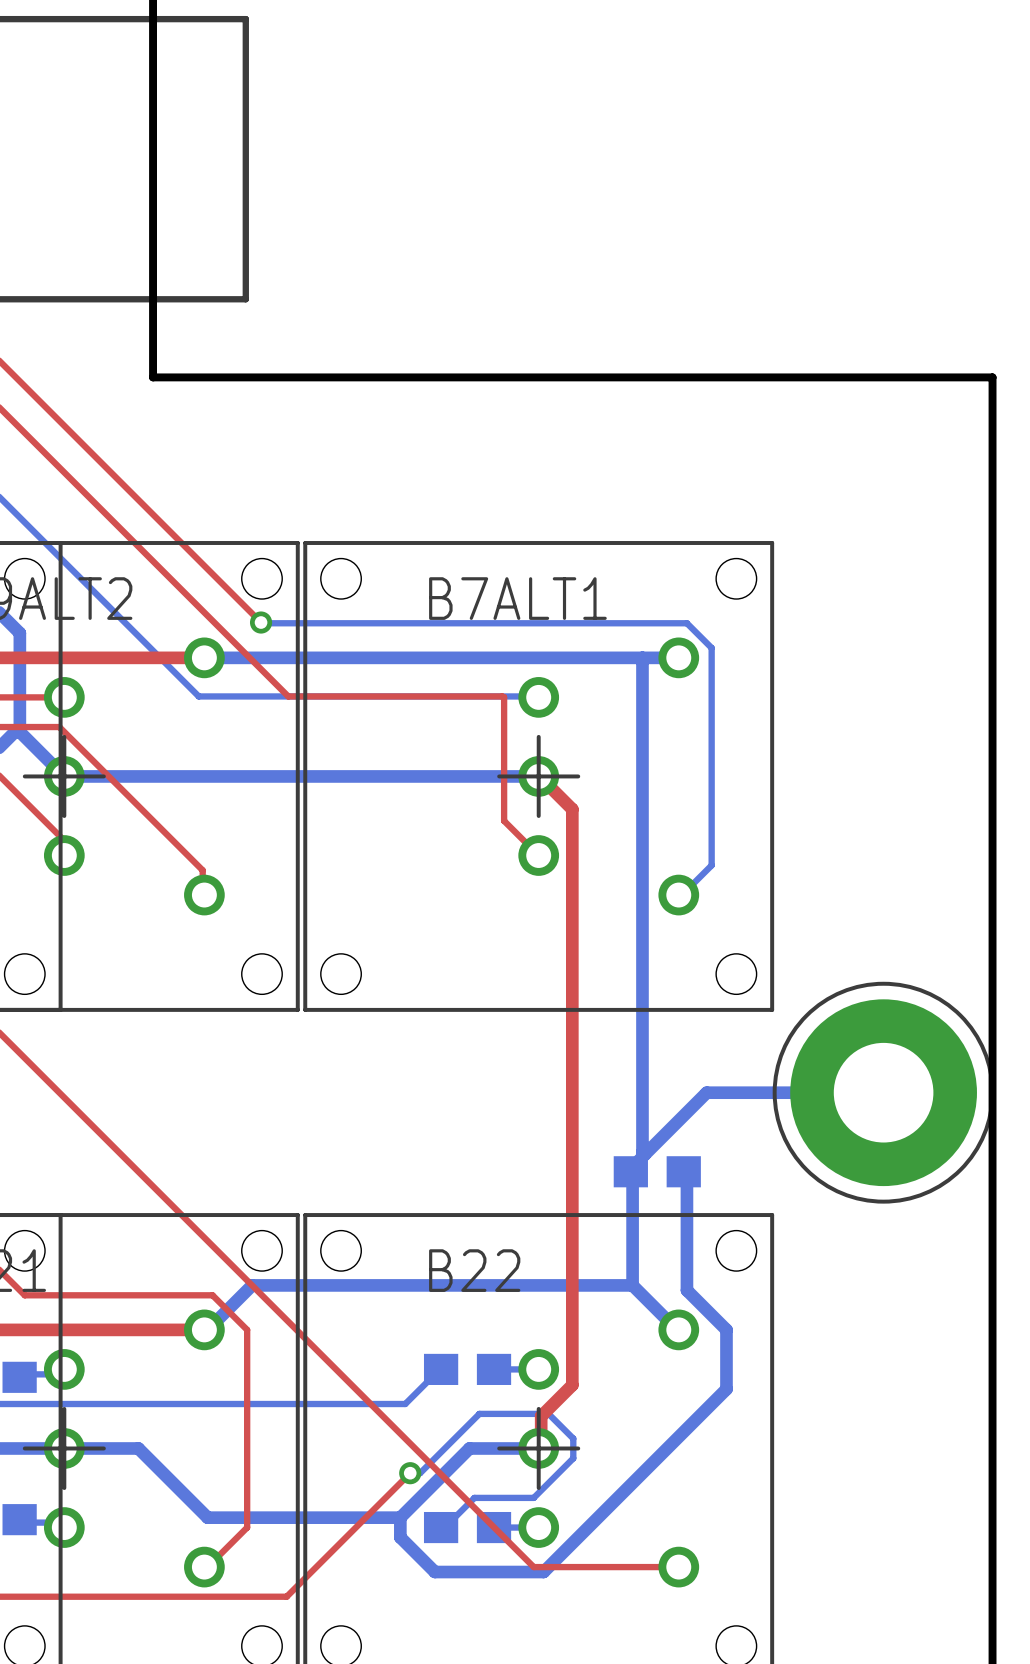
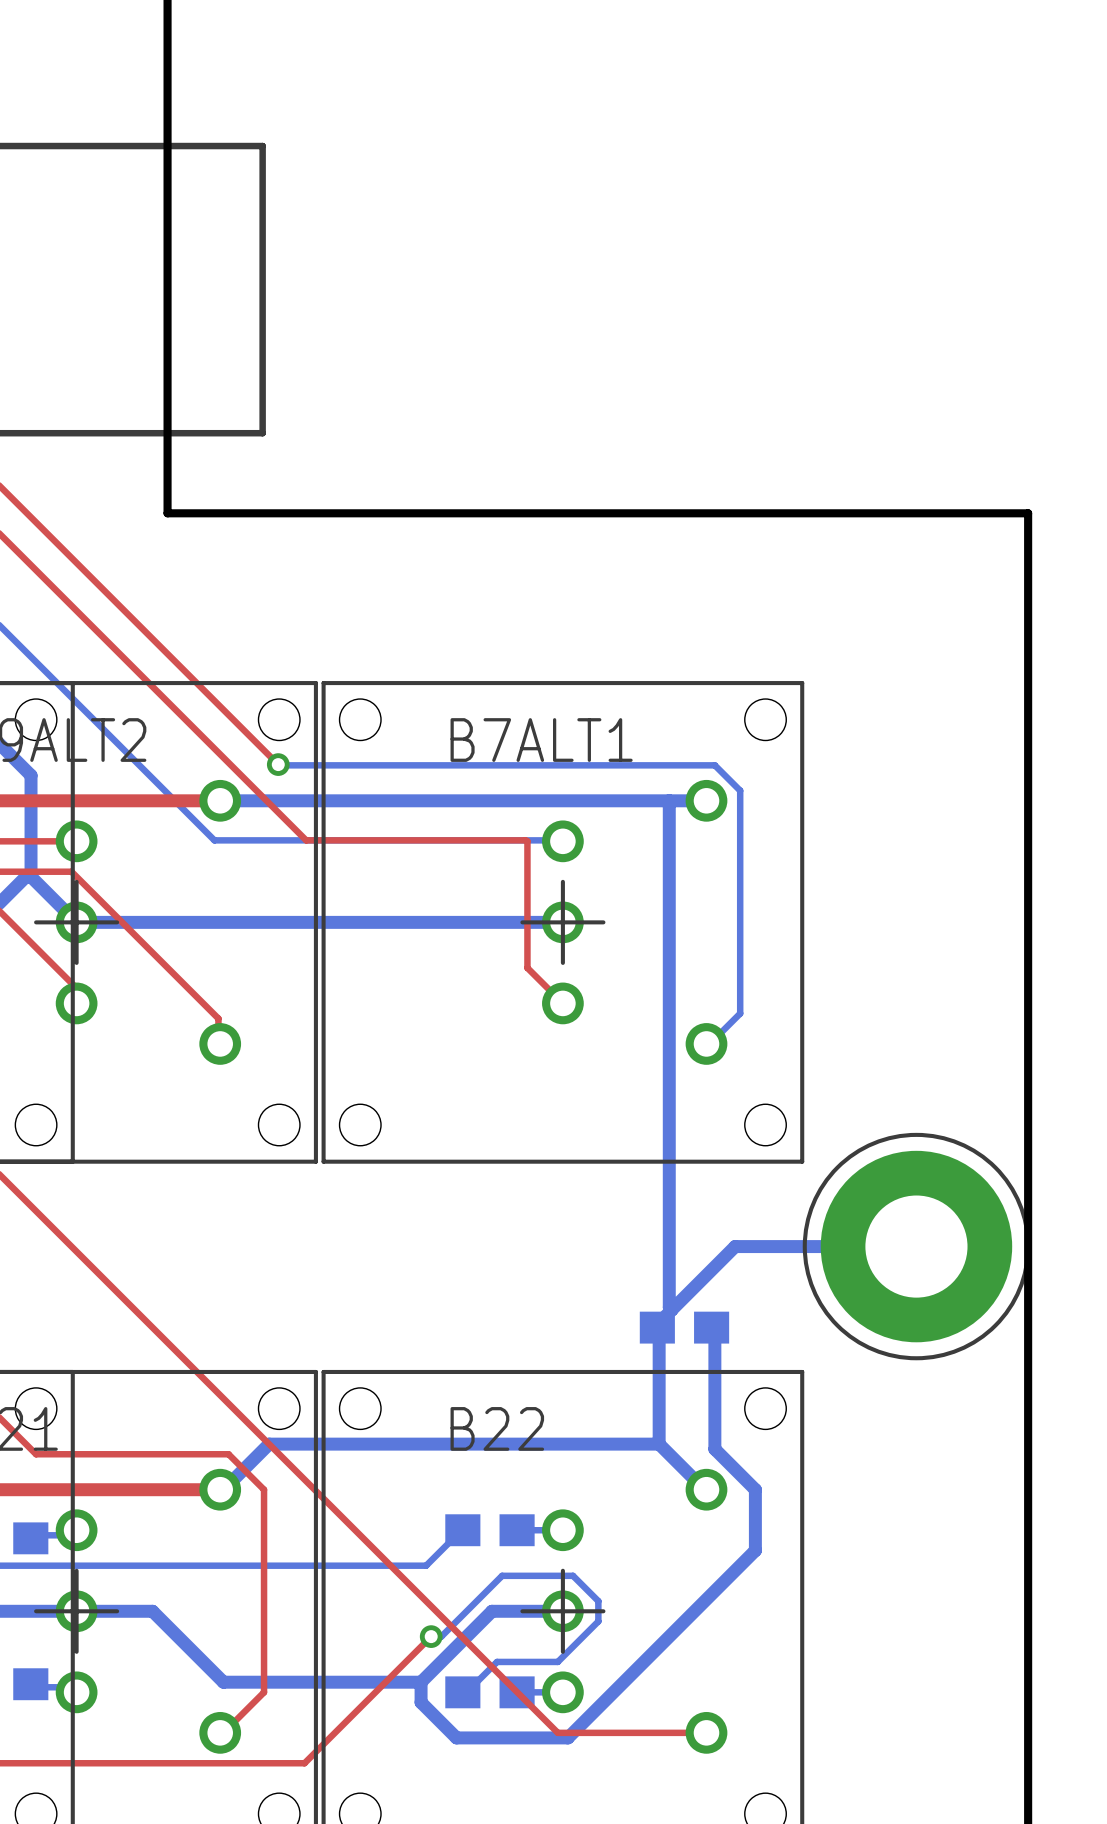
top track: (538, 776) (572, 809) (572, 1385) (541, 1416) (541, 1447) (538, 1448) -> none

